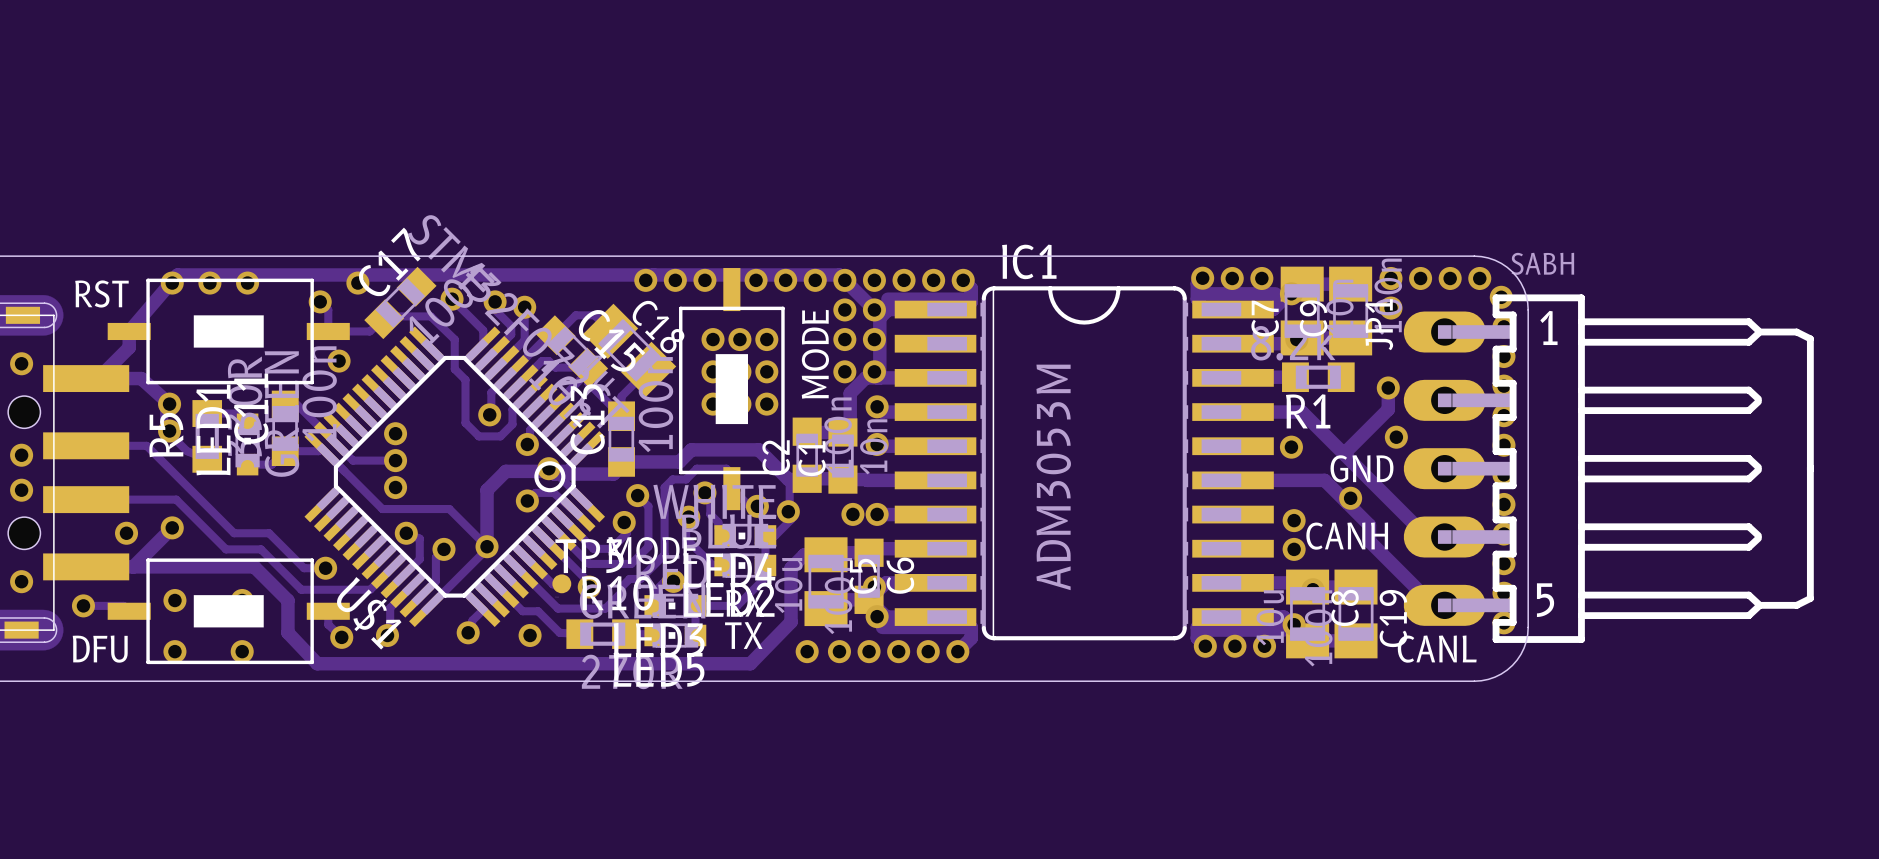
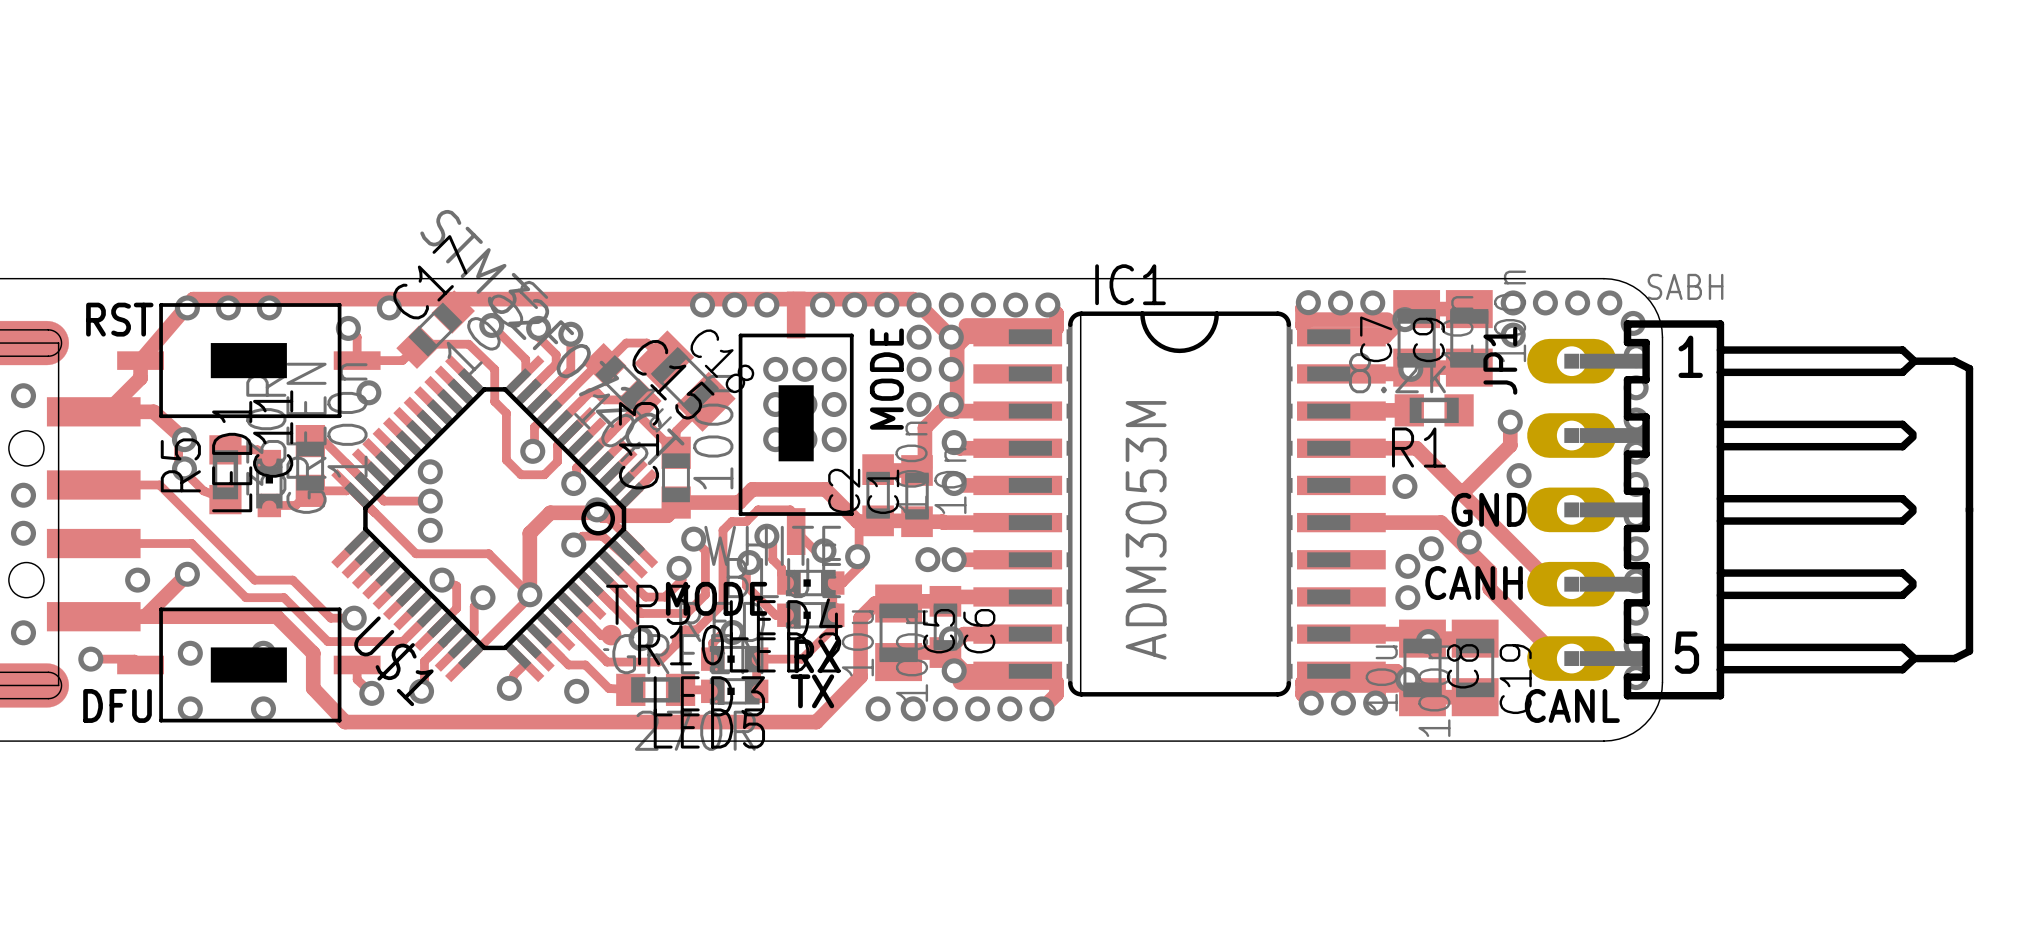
via: none -> (1431, 548)

